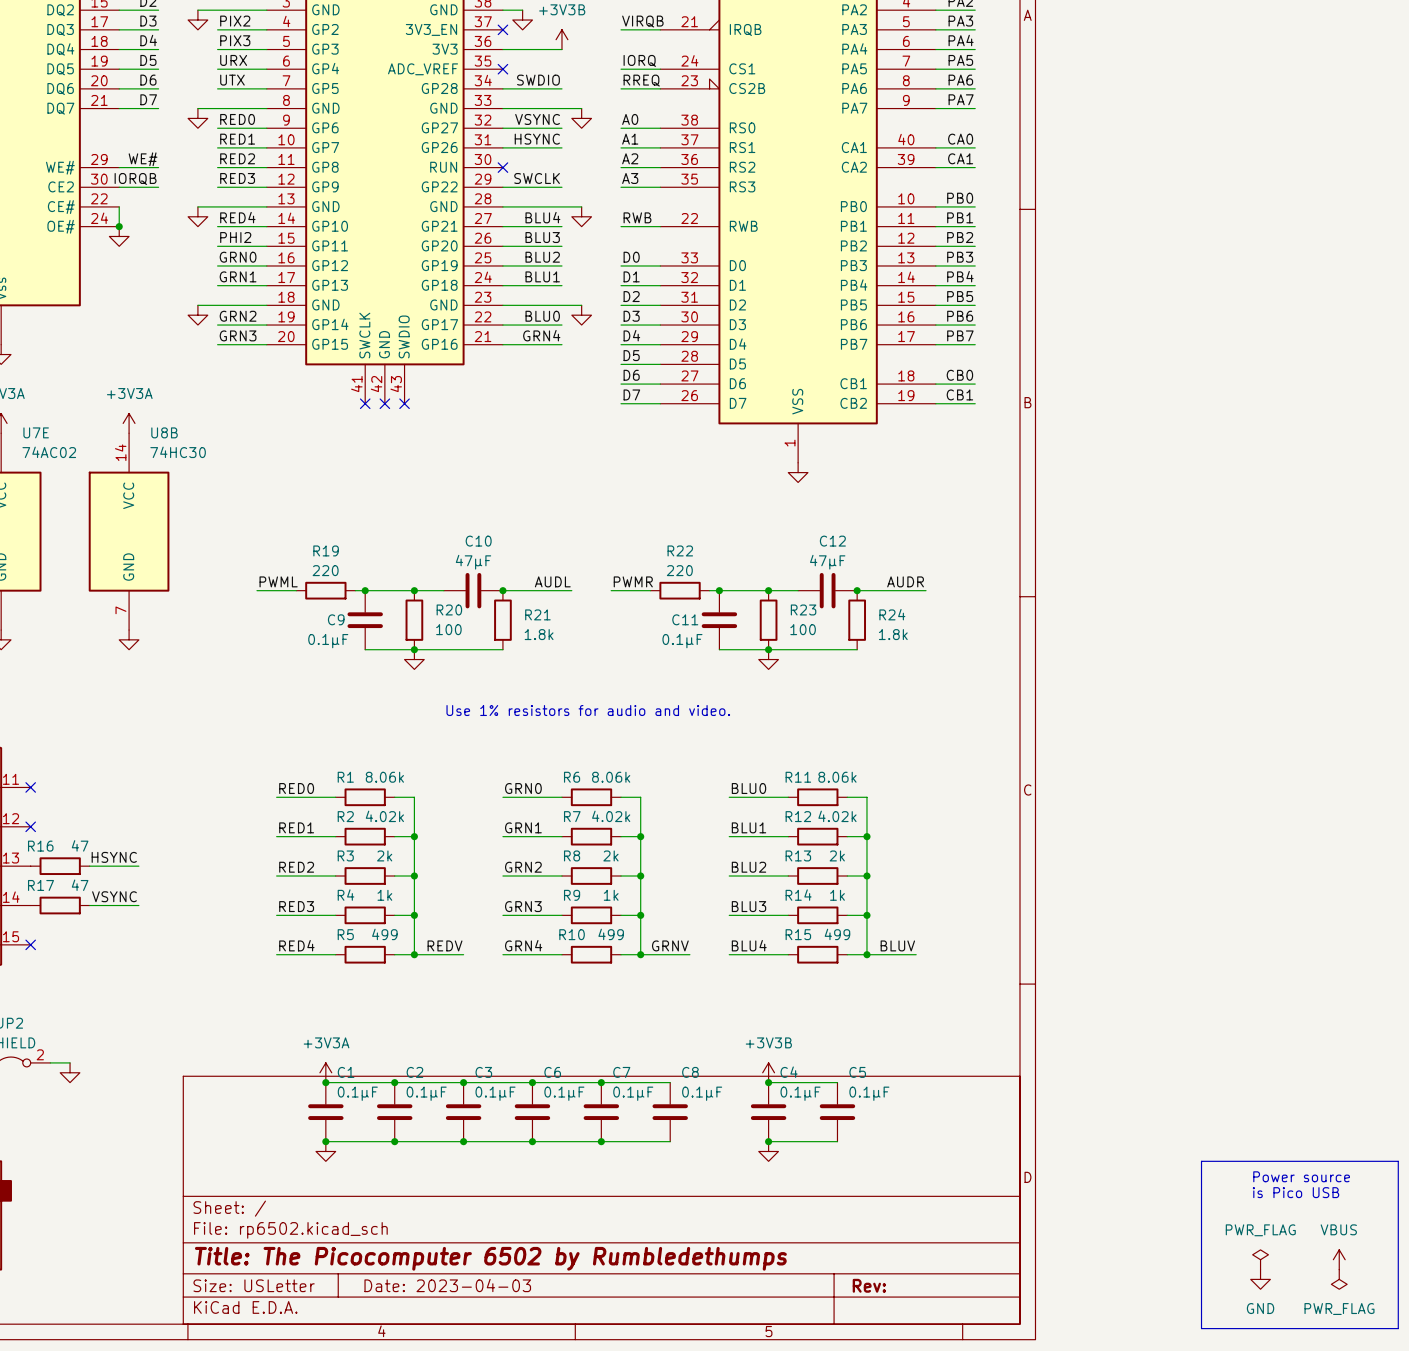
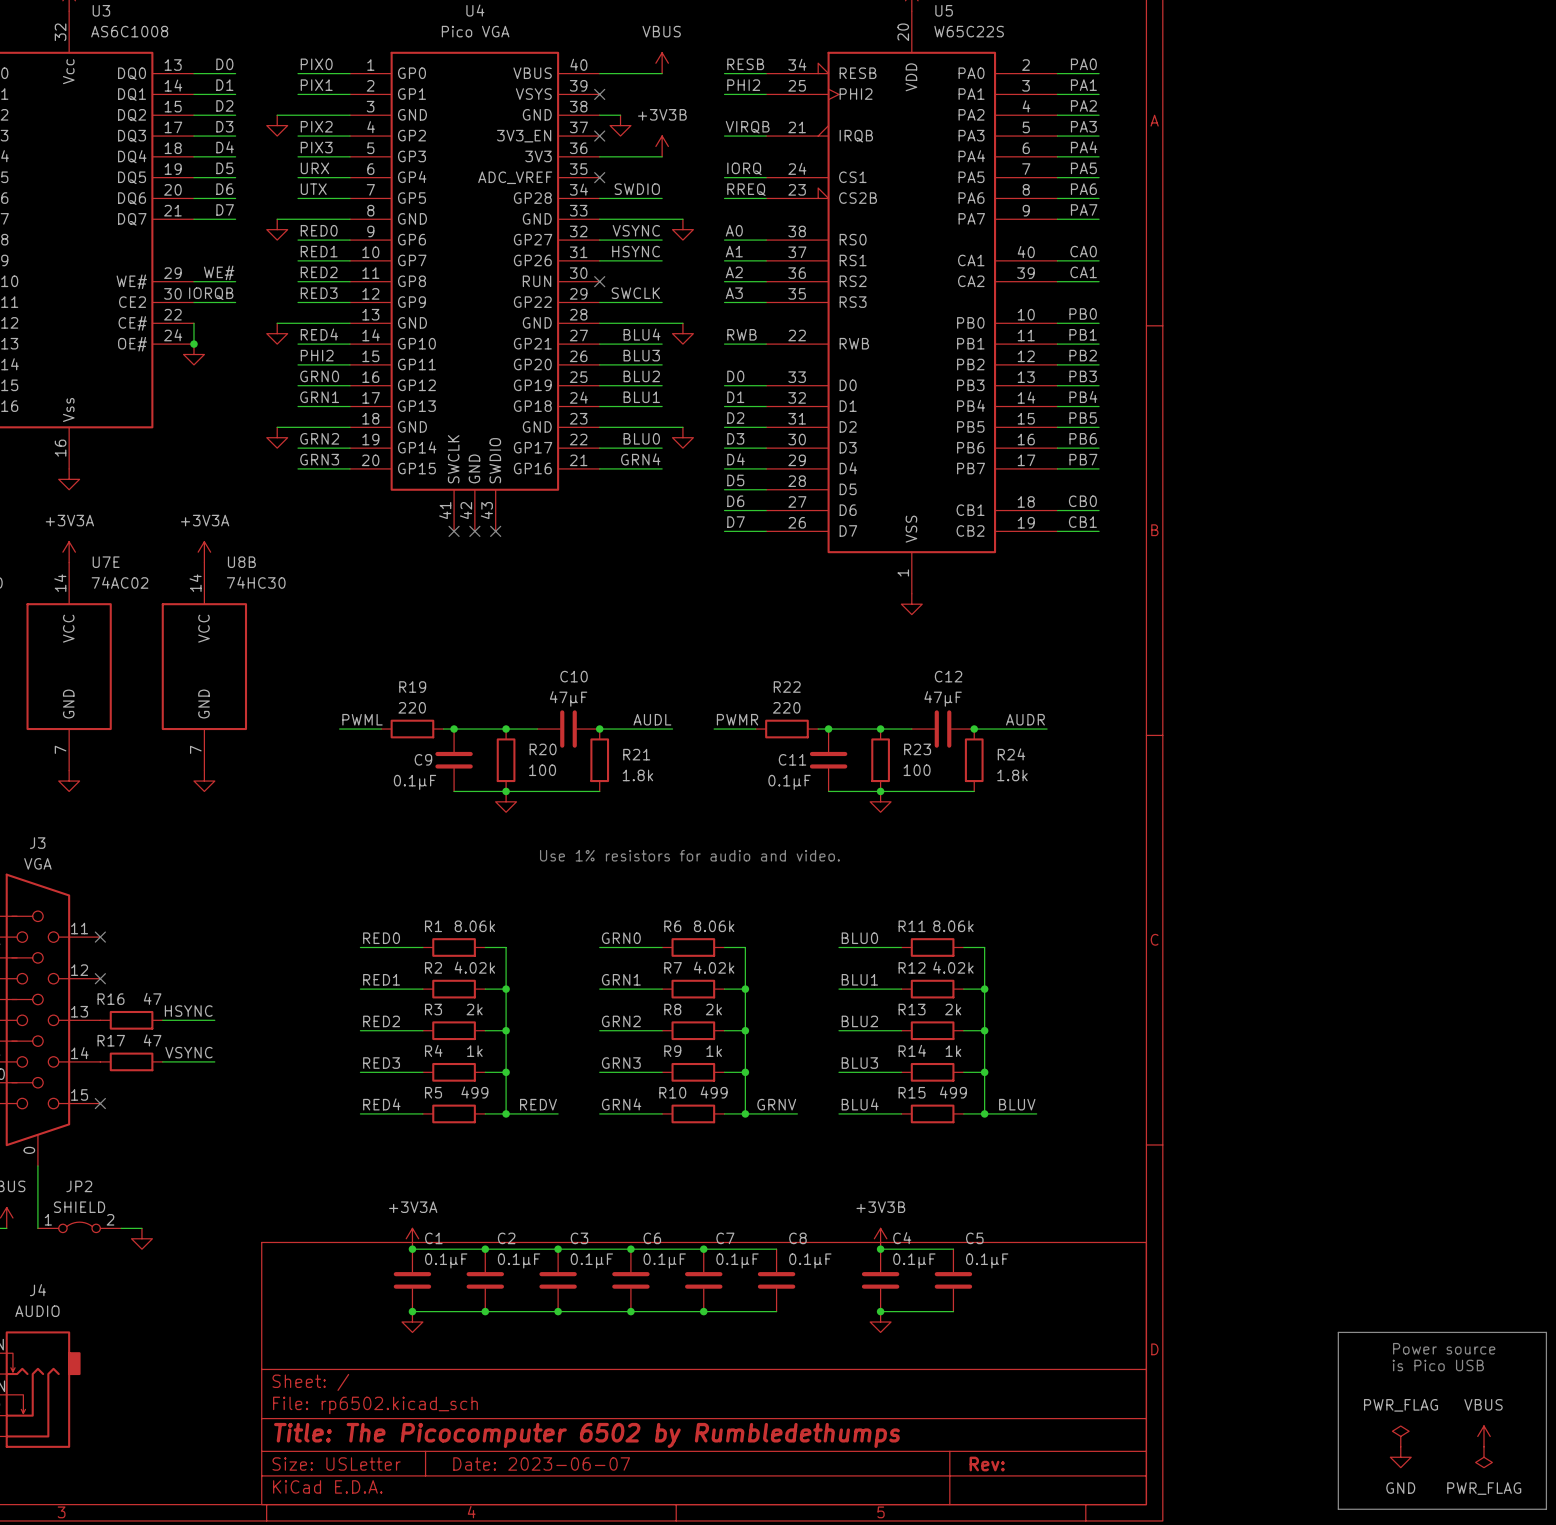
title block: Date: 2023-04-03 (447, 1285) -> Date: 2023-06-07 (541, 1464)

